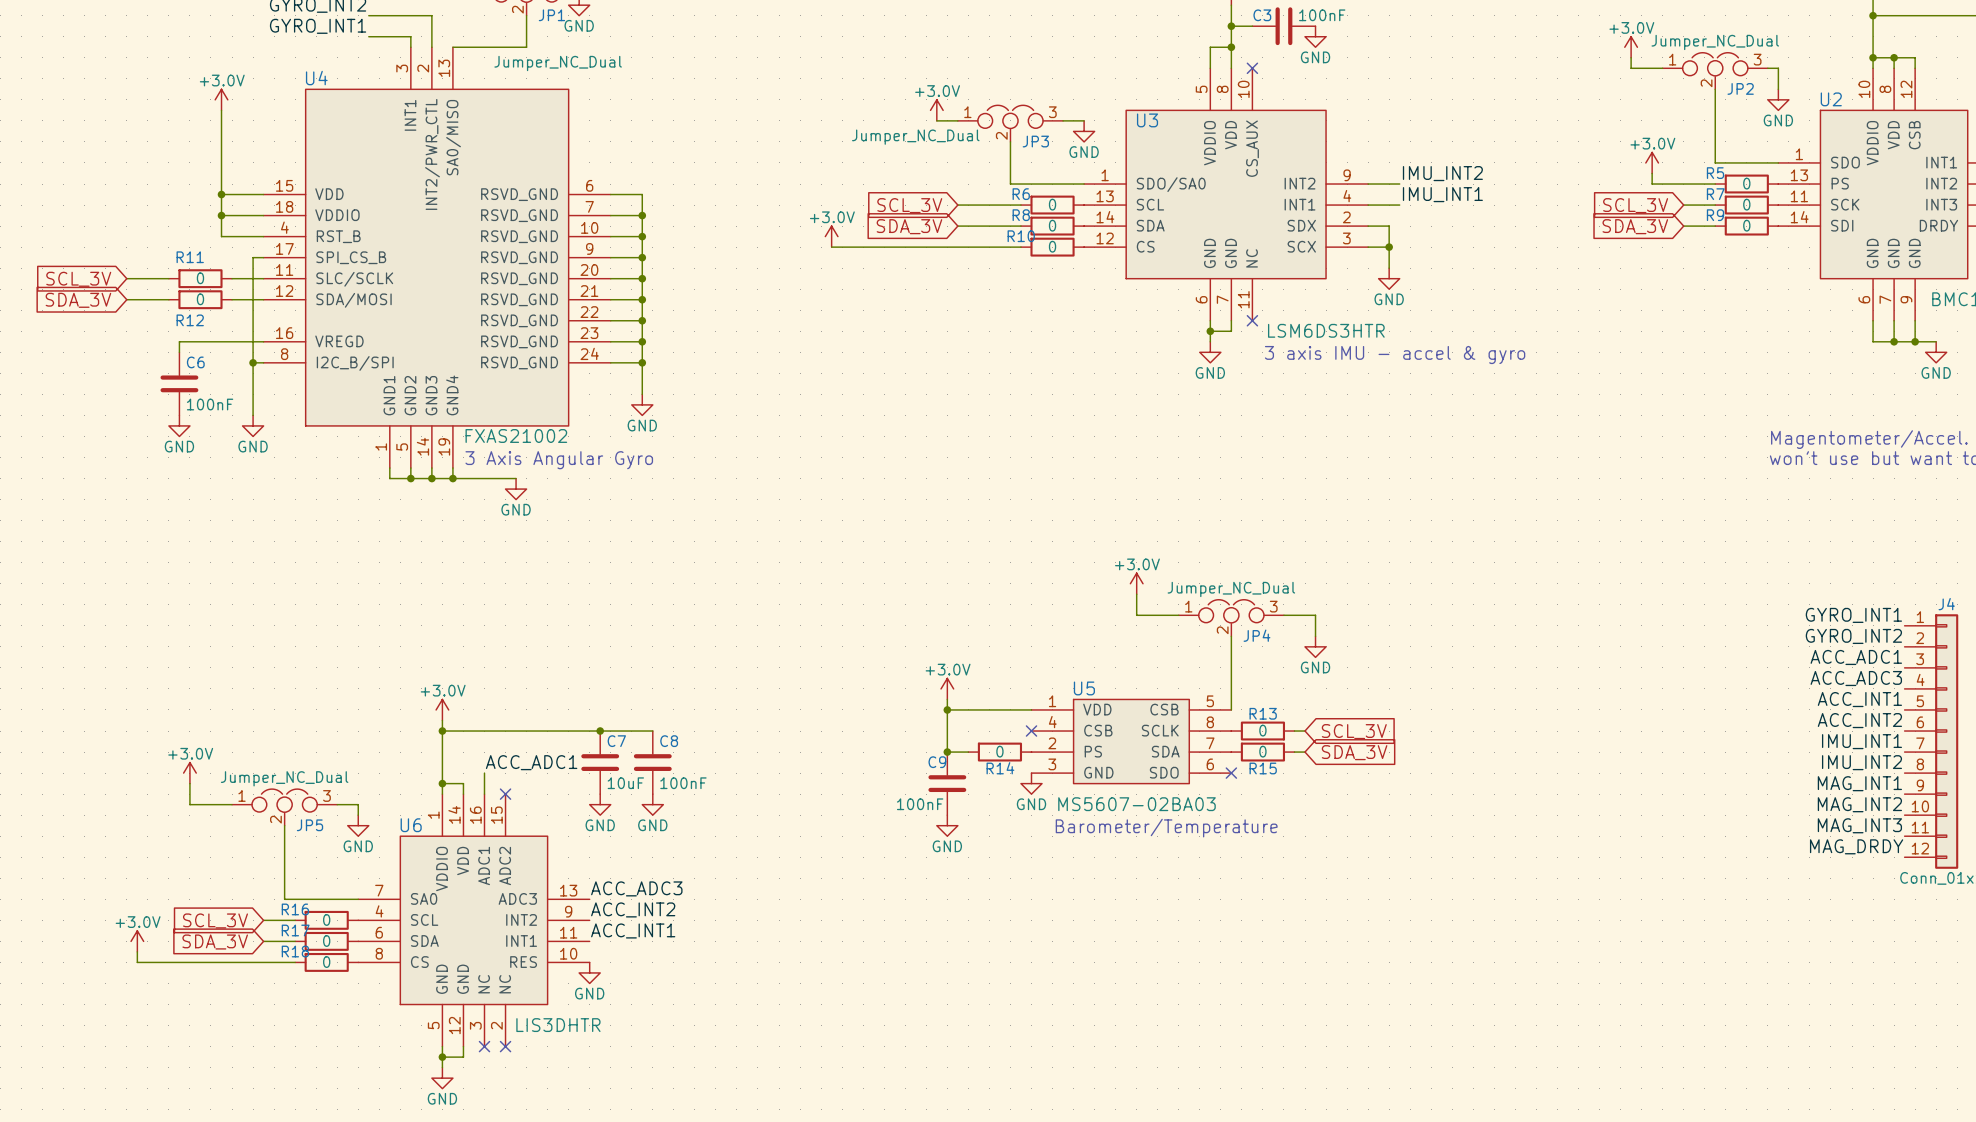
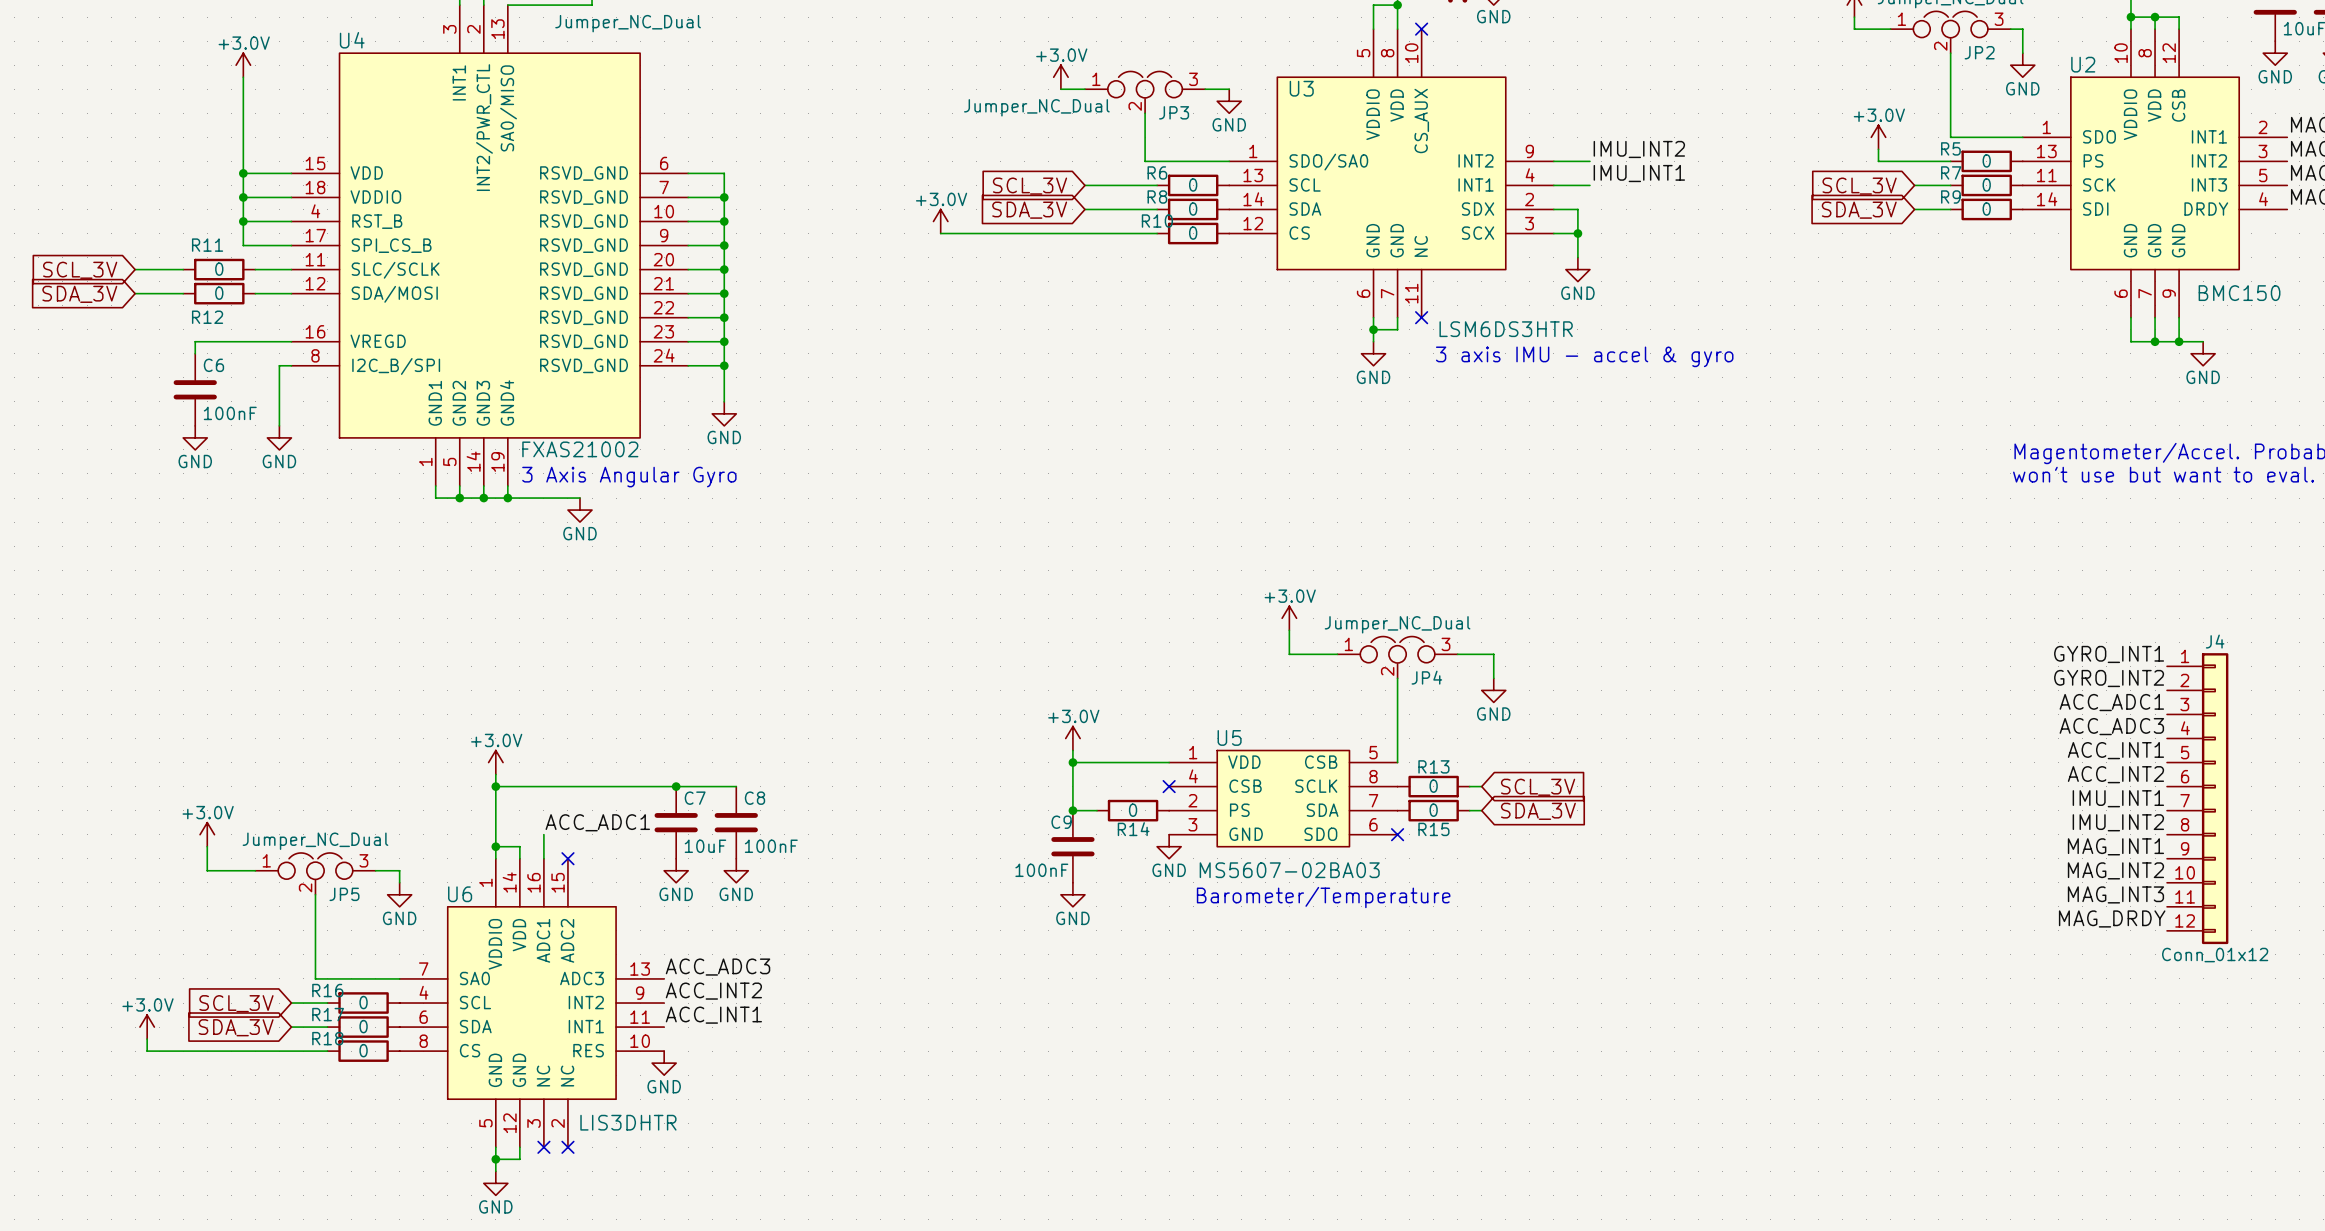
junction: none -> (243, 221)
wire: (253, 257) (253, 362) -> (279, 245) (243, 245) (243, 221)
junction: (253, 362) -> none

